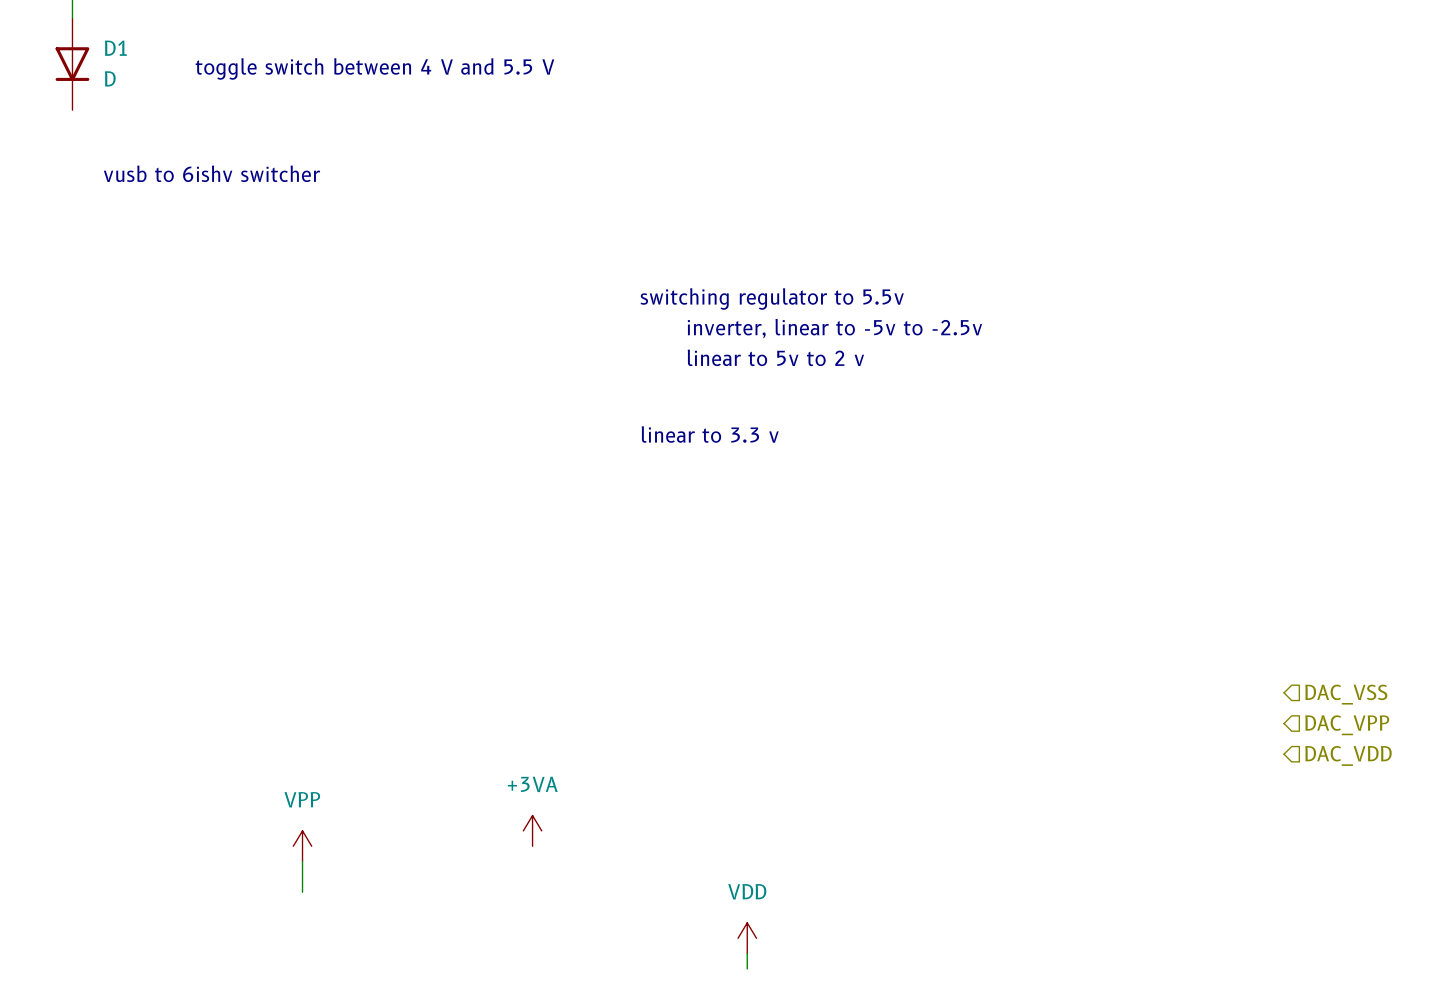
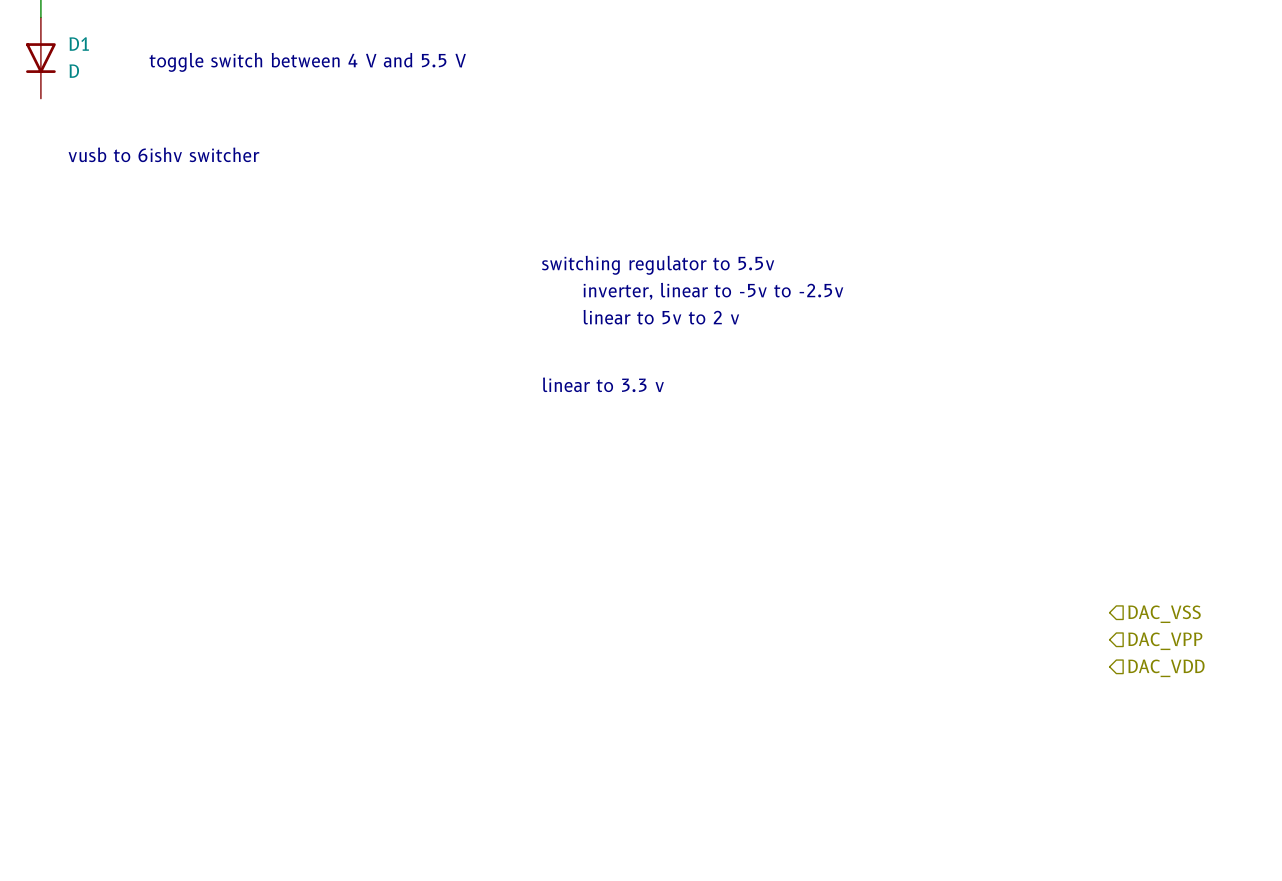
power symbol: +3VA (532, 830) -> none
power symbol: VPP (302, 846) -> none
wire: (302, 861) (302, 892) -> none
power symbol: VDD (747, 938) -> none
wire: (747, 953) (747, 968) -> none

